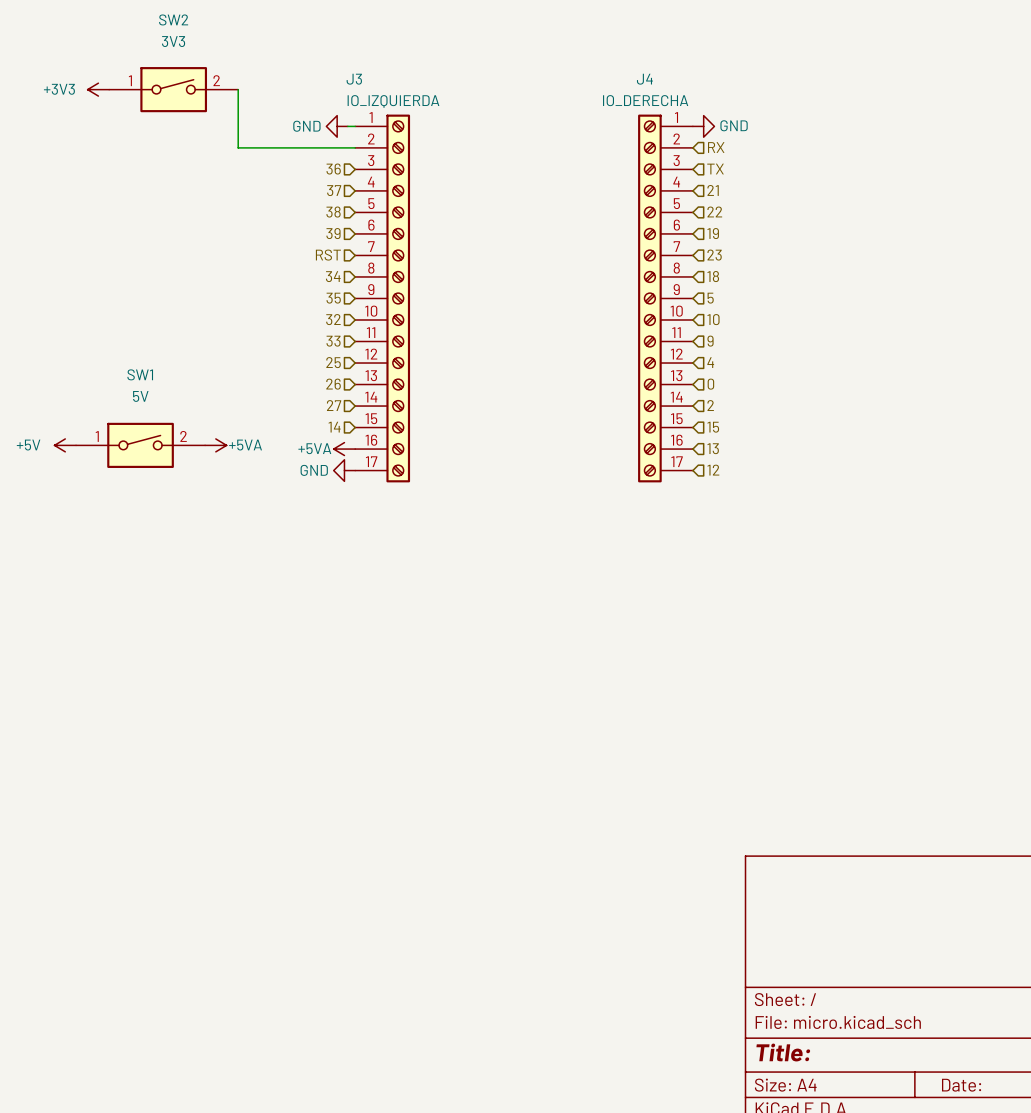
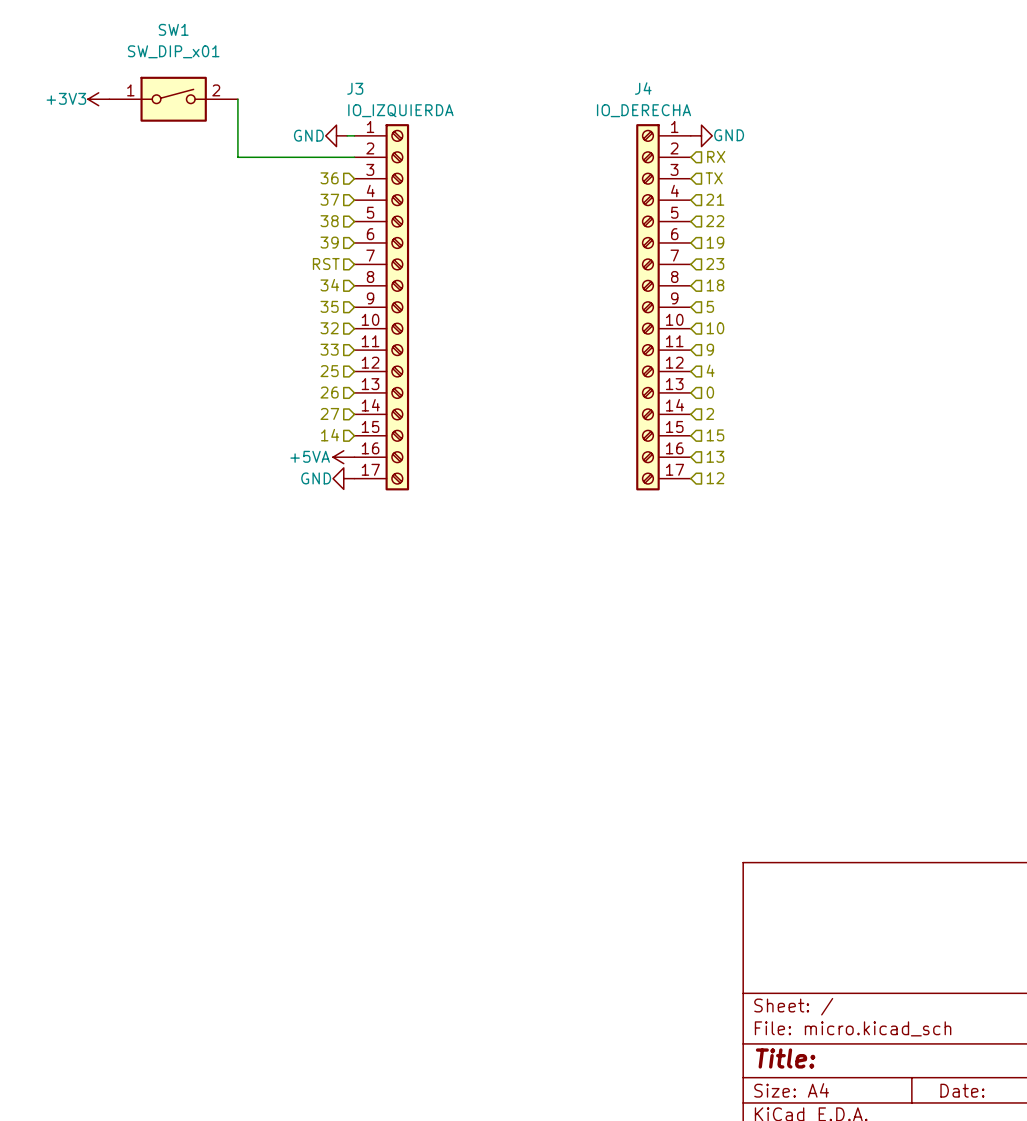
SW2 name: SW2 (173, 19) -> SW1 (173, 29)
SW2 value: 3V3 (173, 41) -> SW_DIP_x01 (173, 51)
power symbol: +5V (65, 445) -> none
SW1: 5V (140, 445) -> none
power symbol: +5VA (215, 445) -> none

